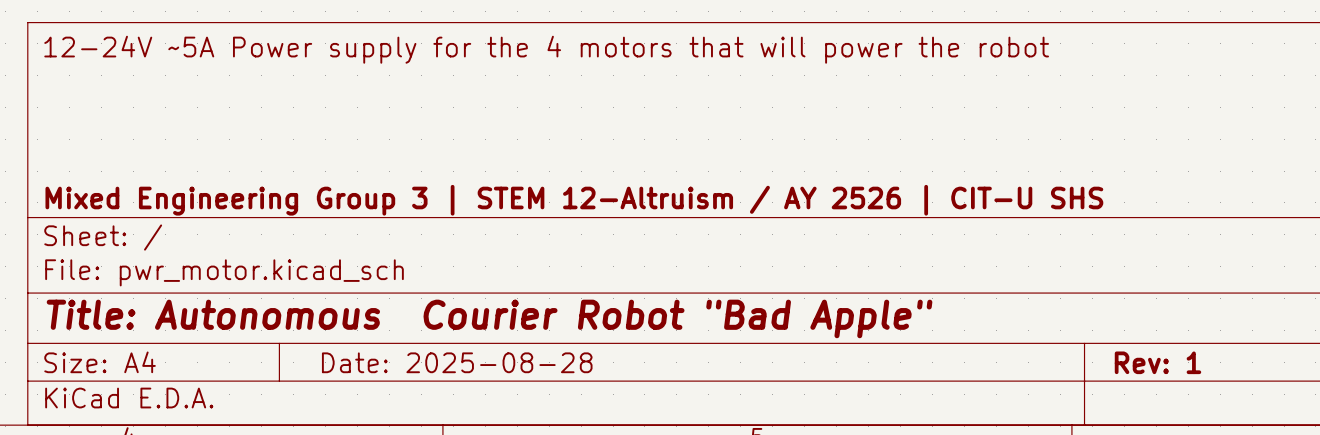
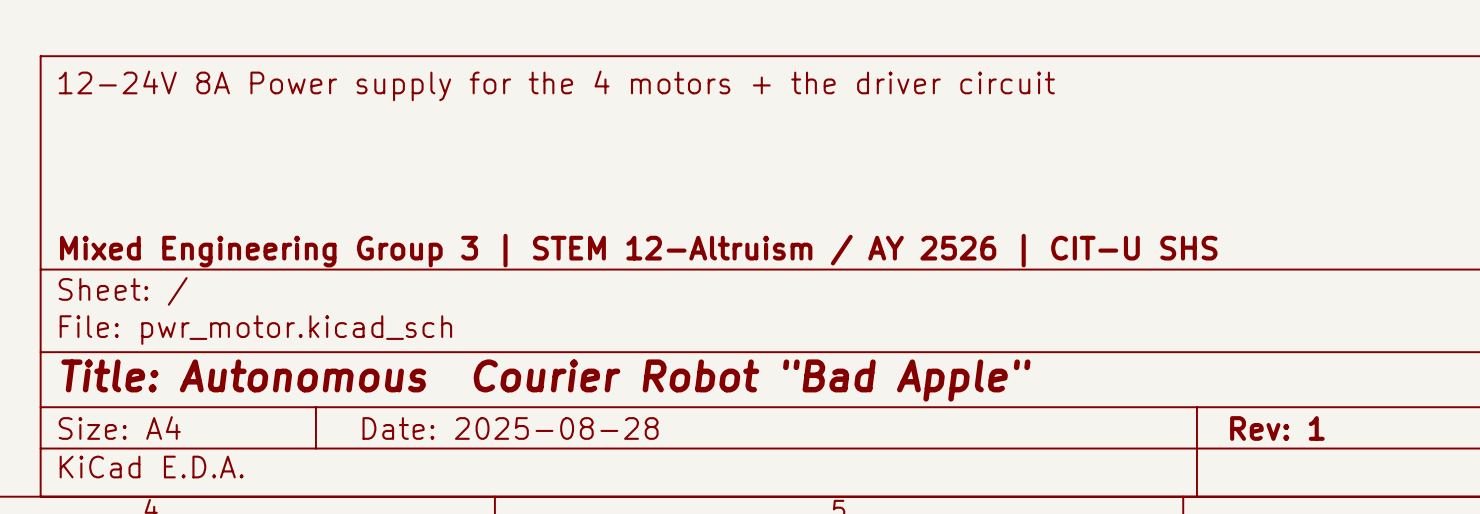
title block: 12-24V ~5A Power supply for the 4 motors that will power the robot (546, 49) -> 12-24V 8A Power supply for the 4 motors + the driver circuit (556, 85)

